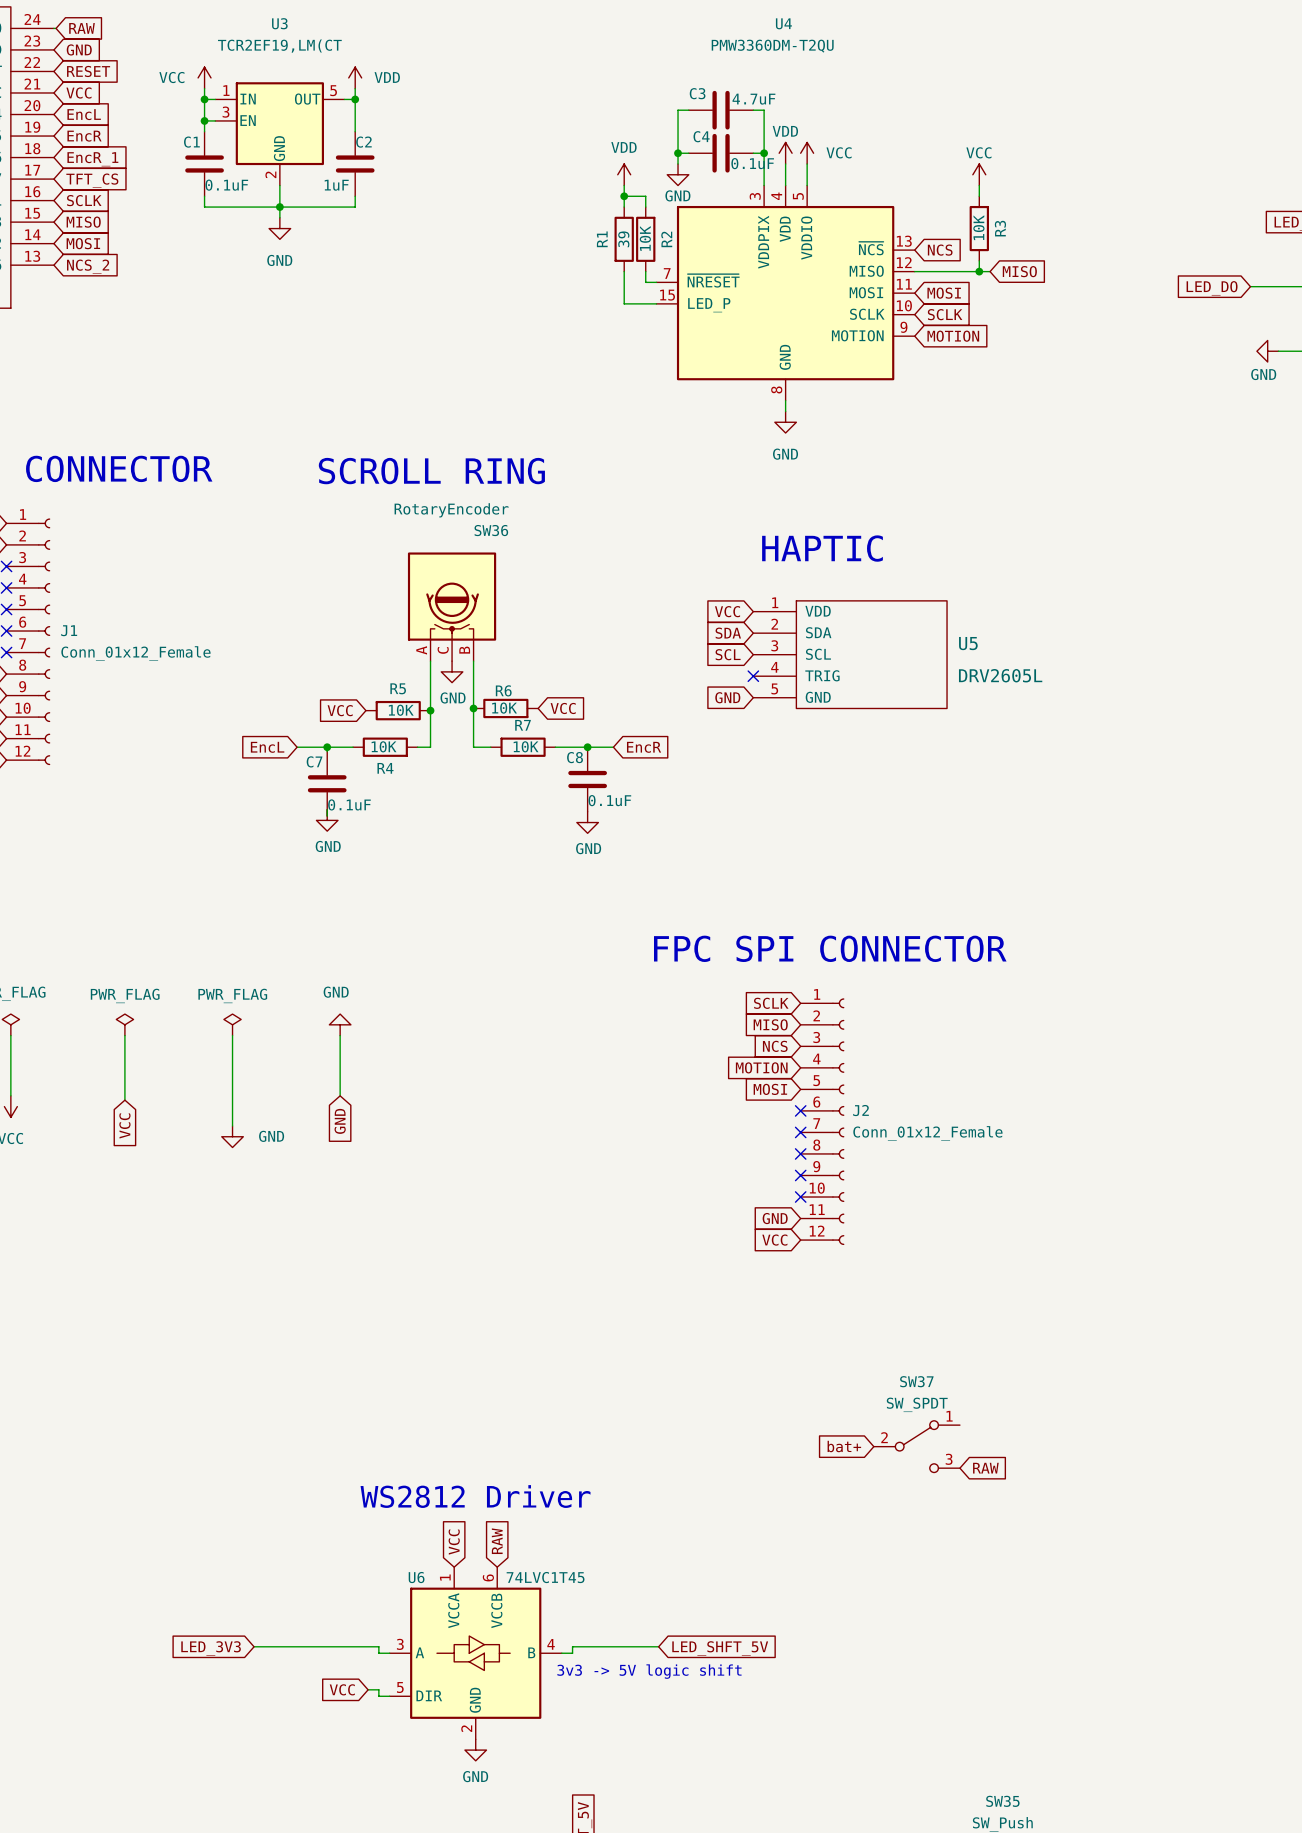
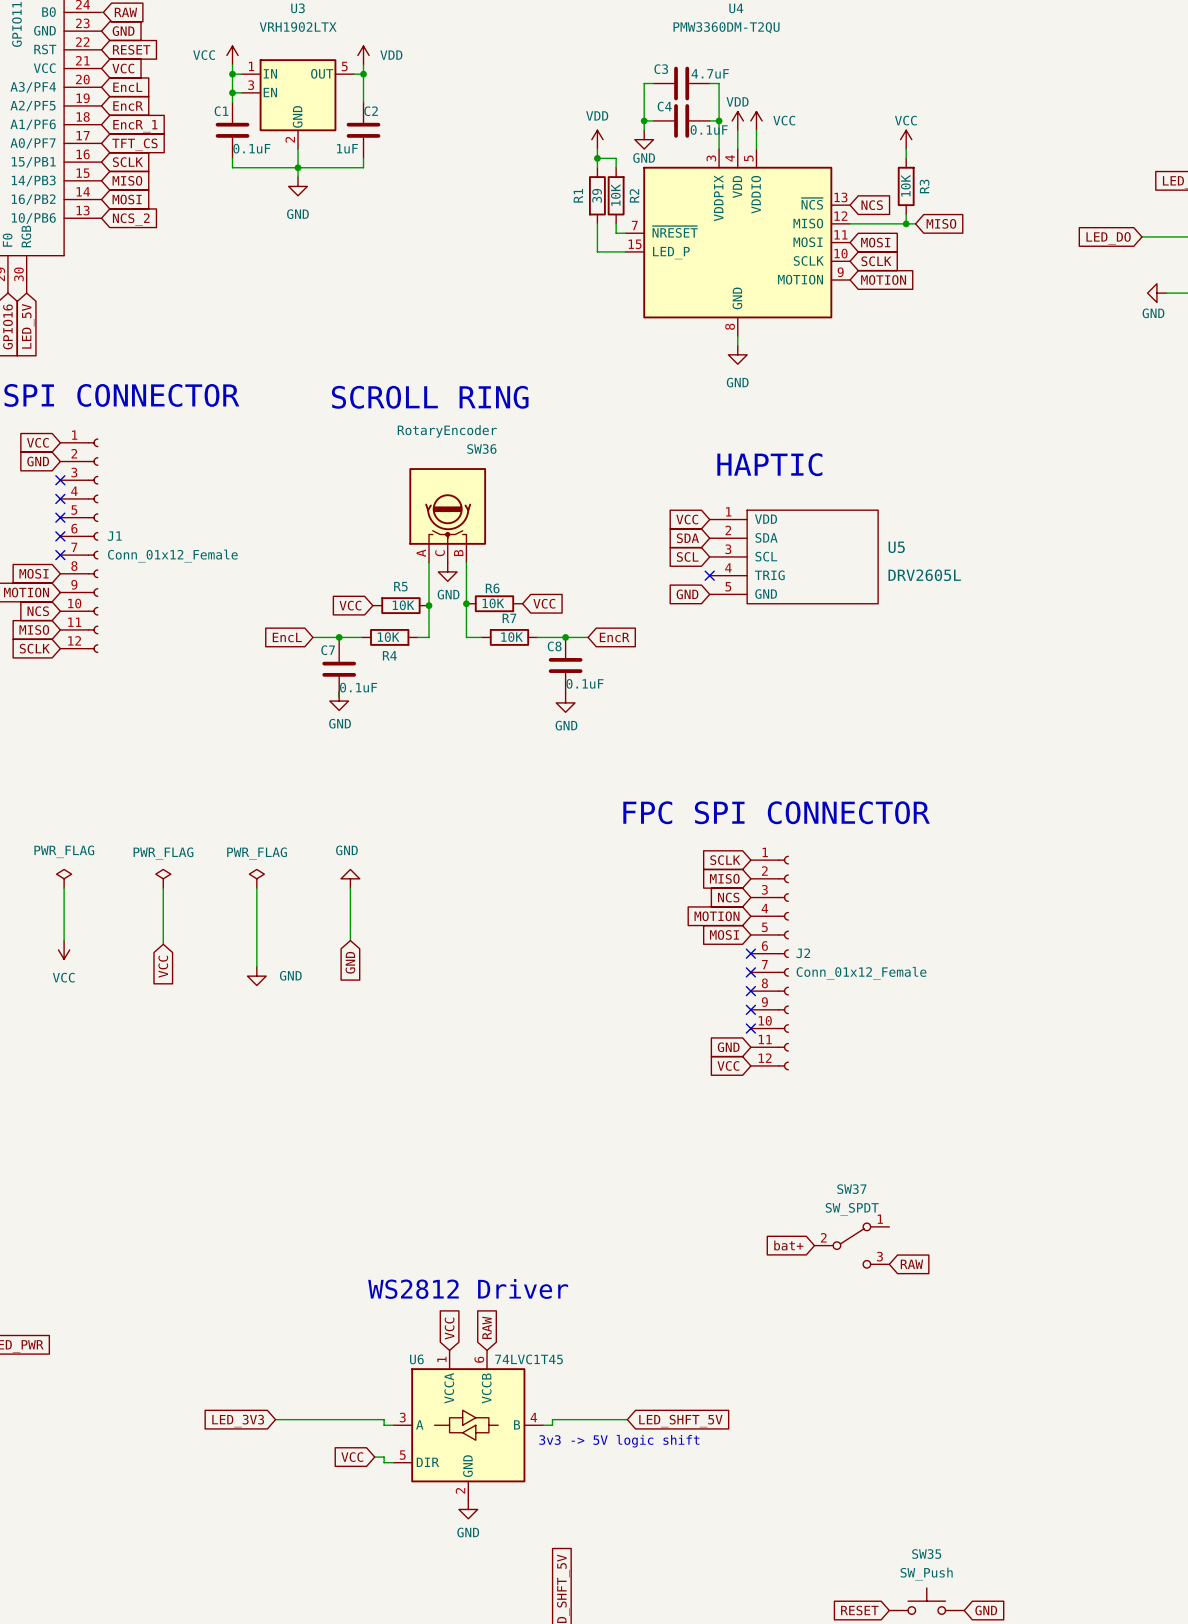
U3 value: TCR2EF19,LM(CT (279, 46) -> VRH1902LTX (298, 27)

